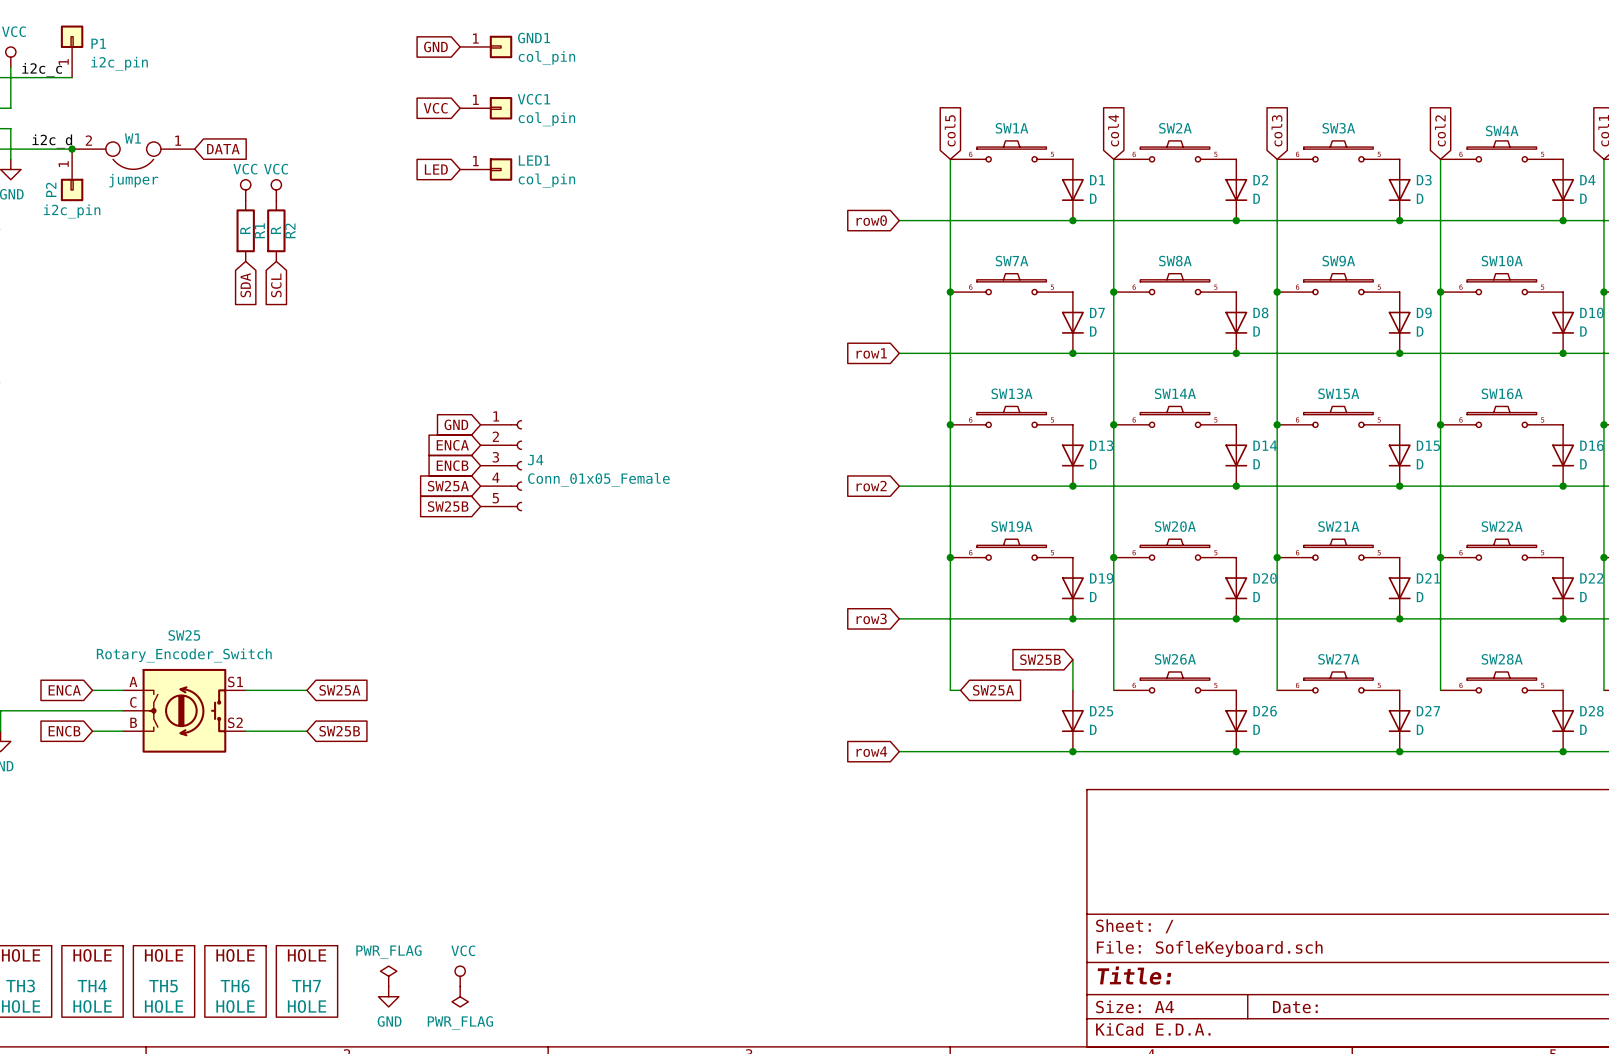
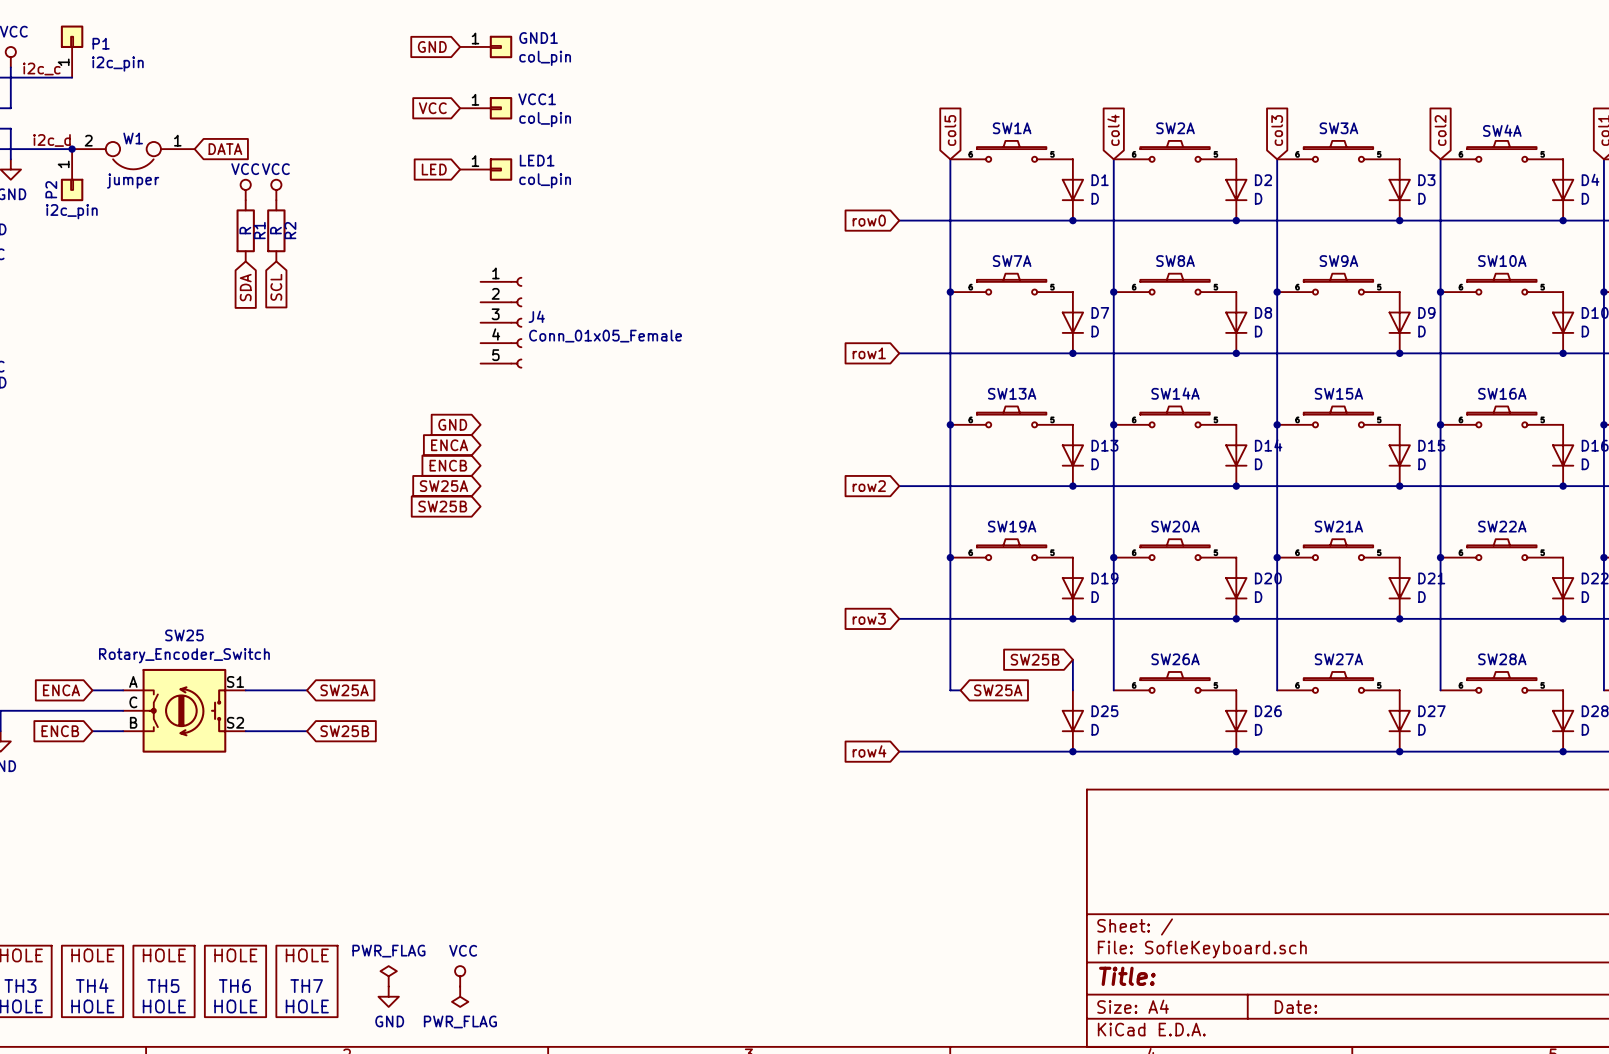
J4 position: (501, 465) -> (501, 322)

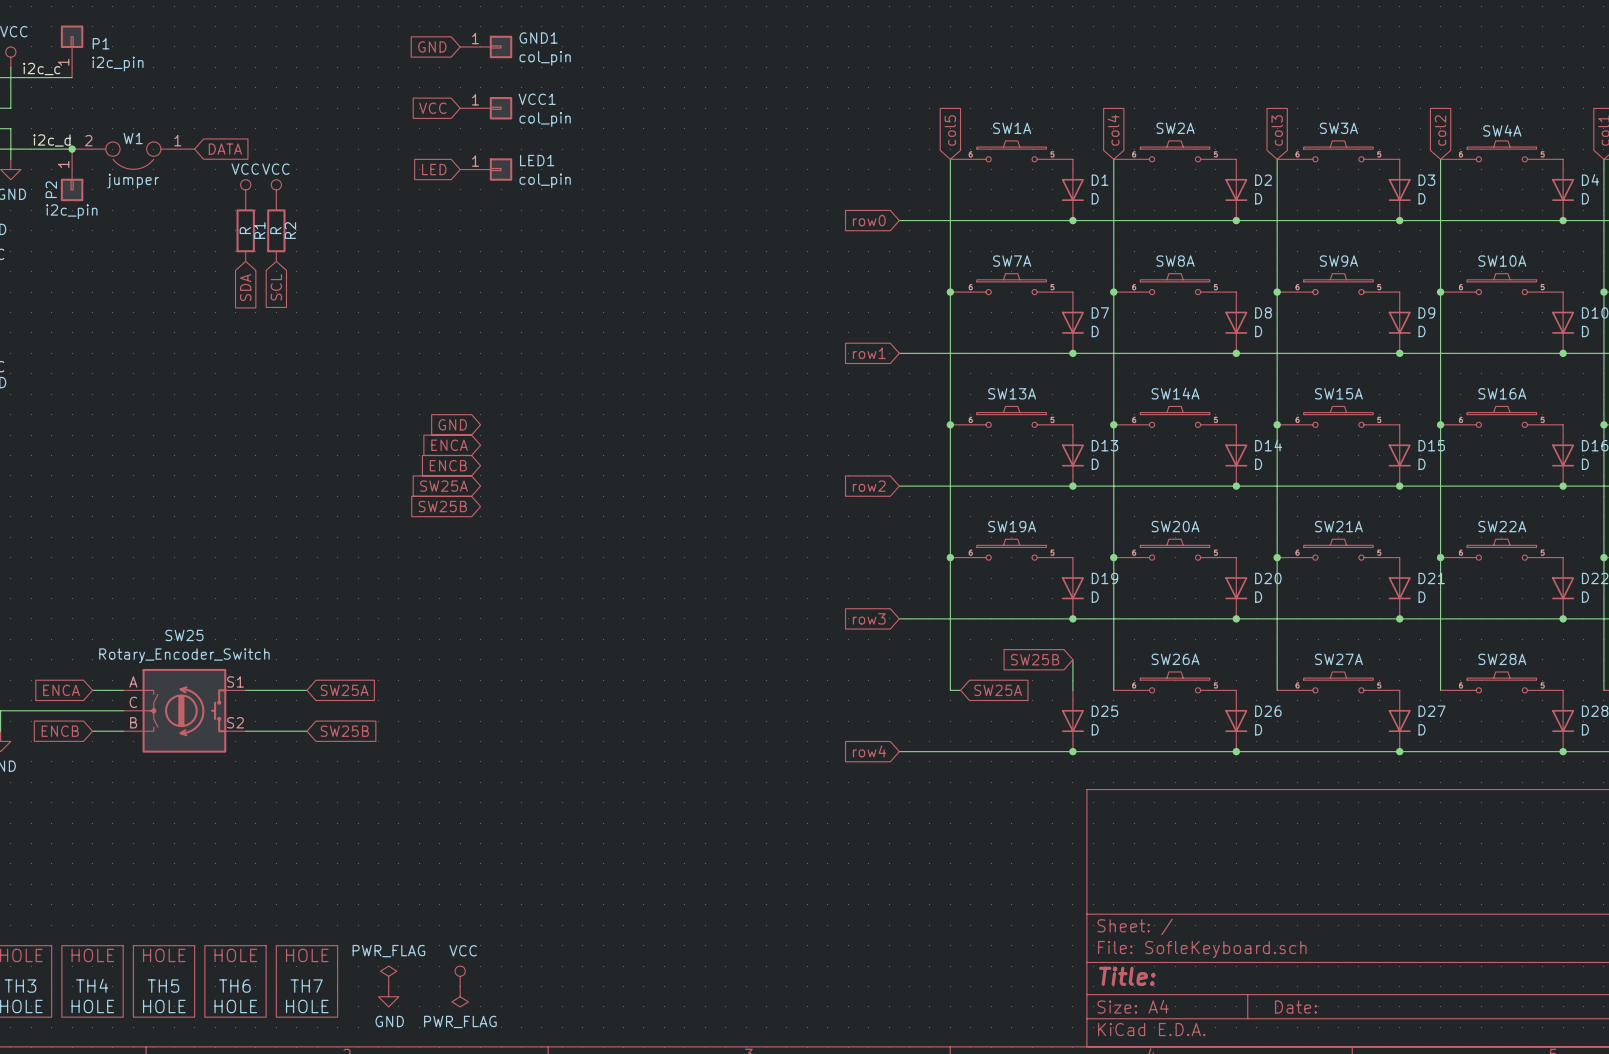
J4: Conn_01x05_Female (501, 322) -> none

